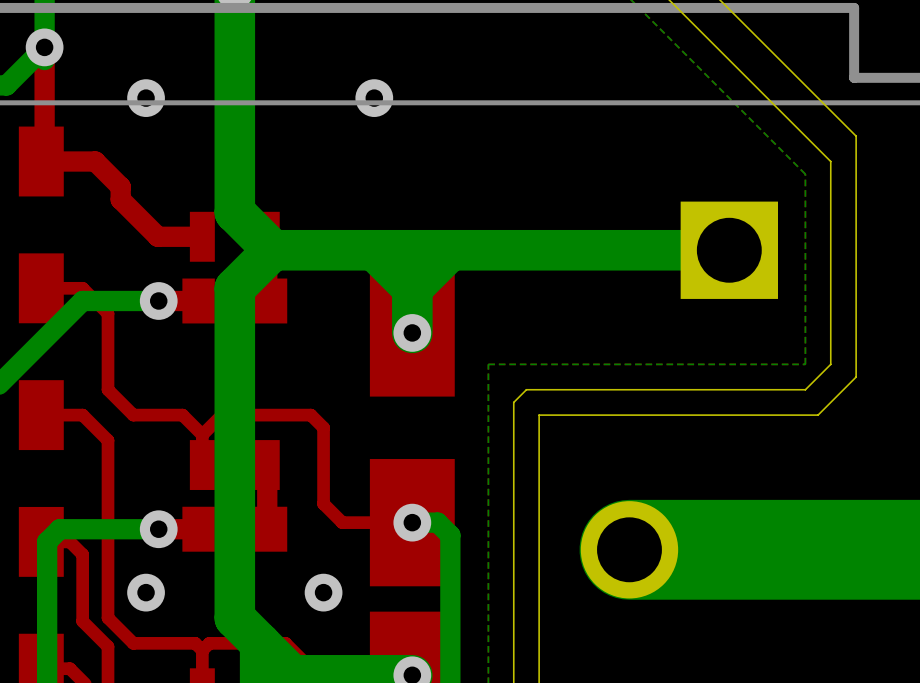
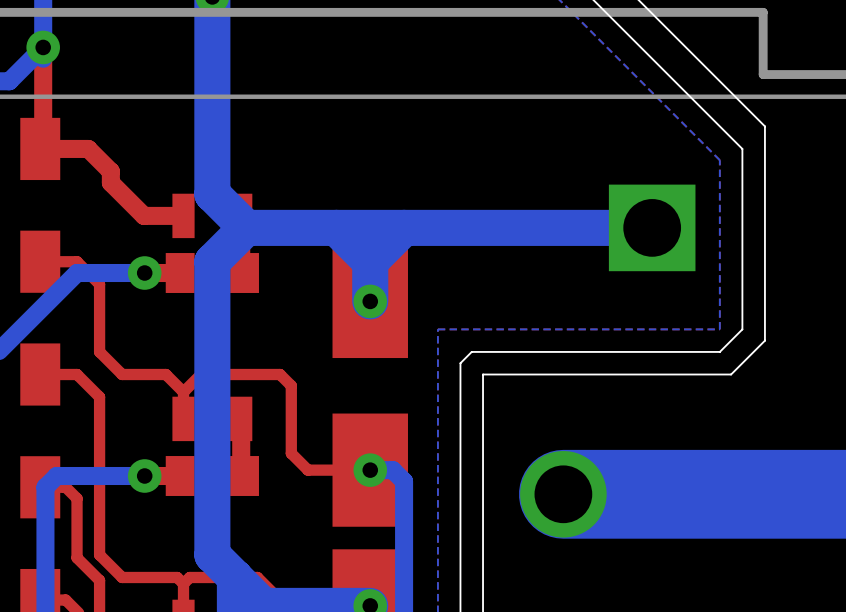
via: (146, 98) -> none
via: (374, 98) -> none
via: (146, 592) -> none
via: (323, 592) -> none

